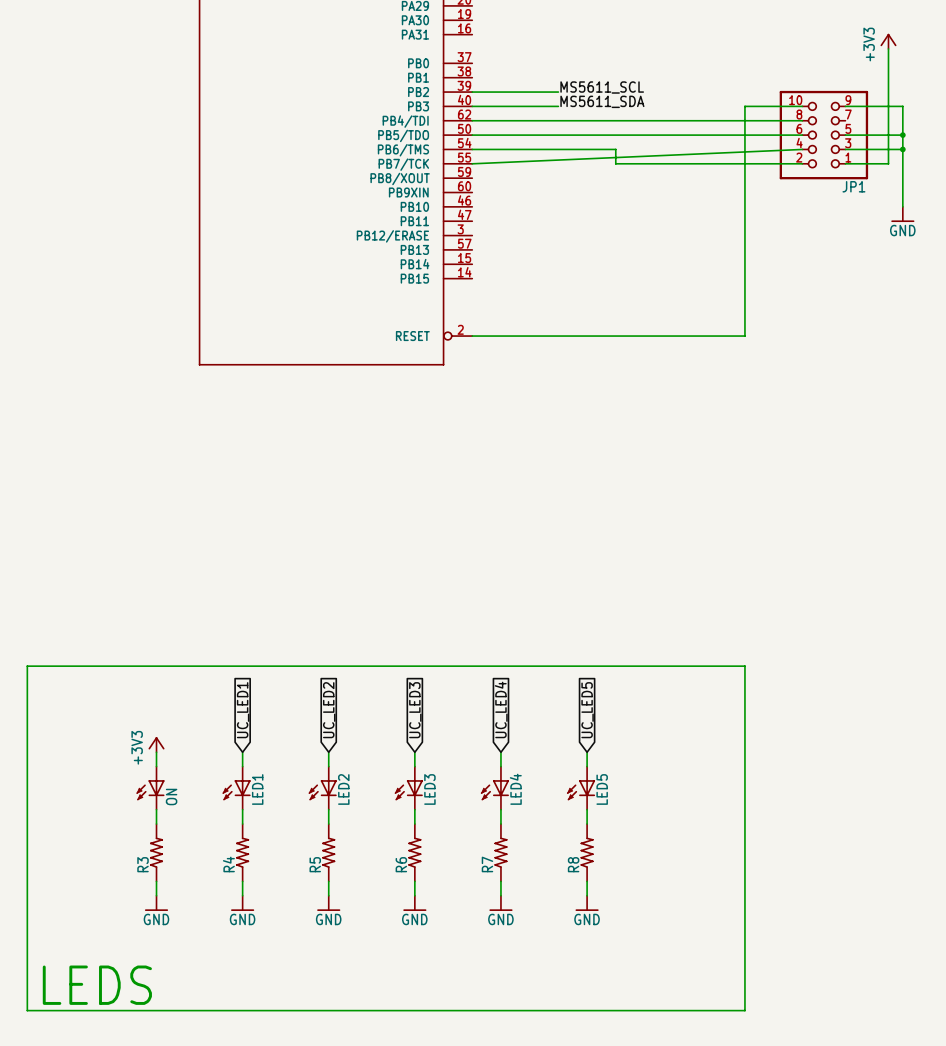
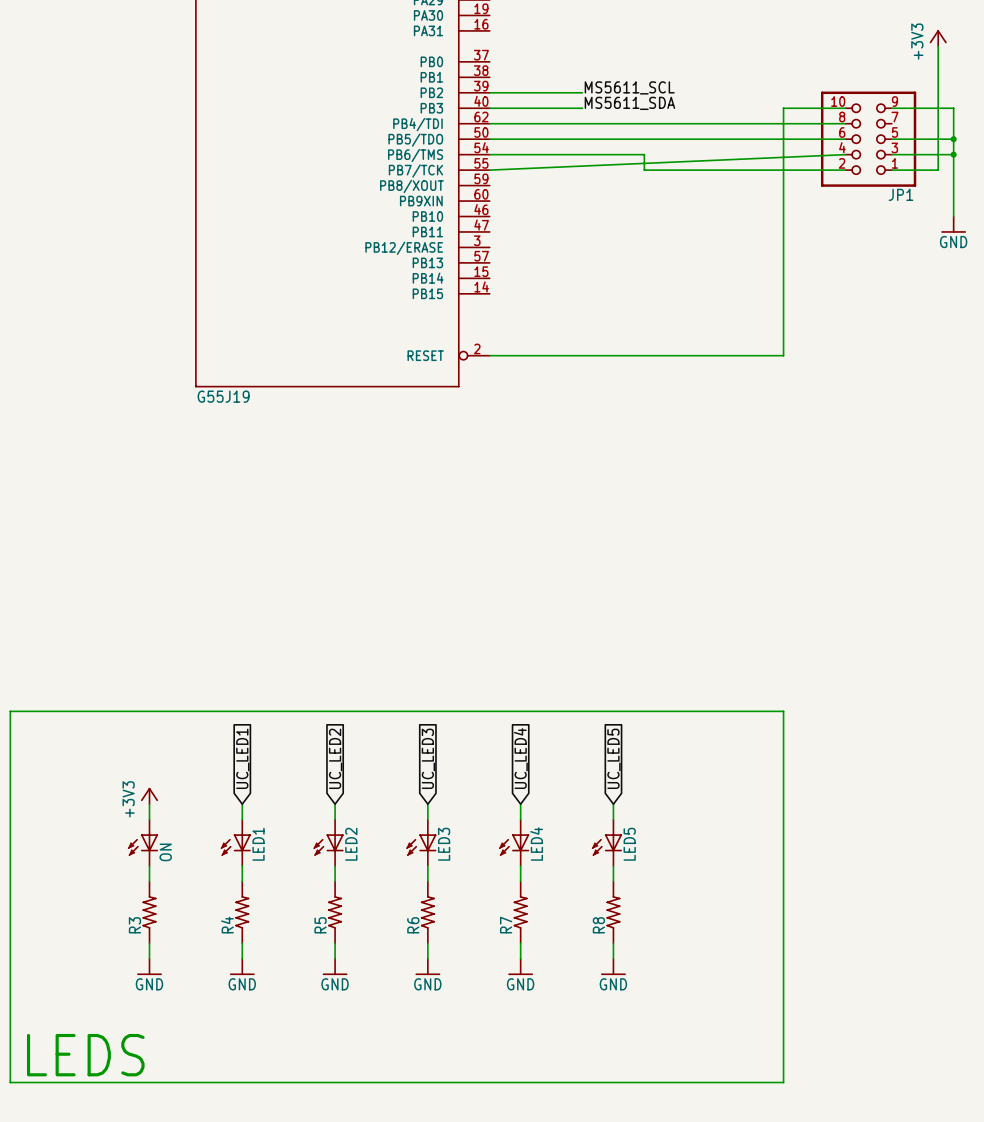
part value: none -> G55J19 (223, 396)

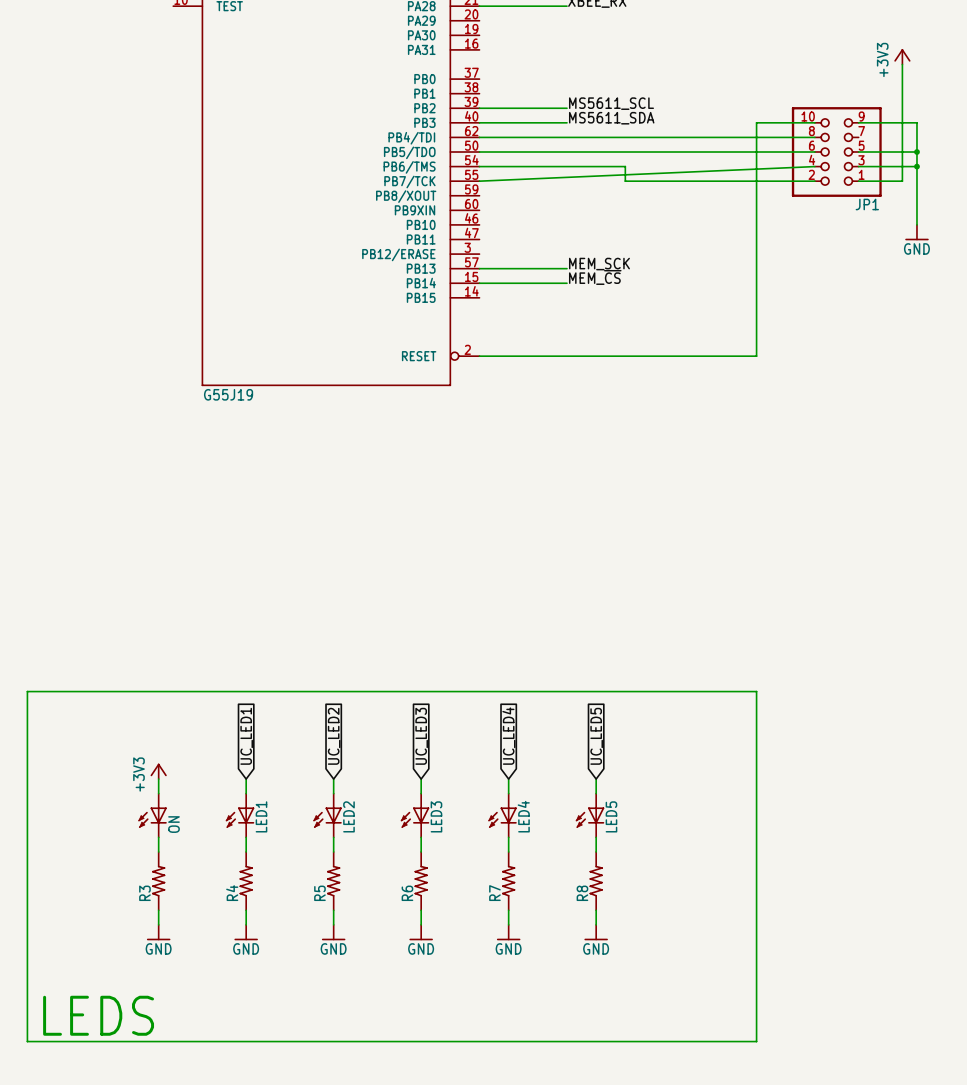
label: none -> MEM_SCK (599, 264)
wire: none -> (479, 268) (566, 268)
label: none -> MEM_~{CS} (595, 277)
wire: none -> (479, 283) (566, 283)

